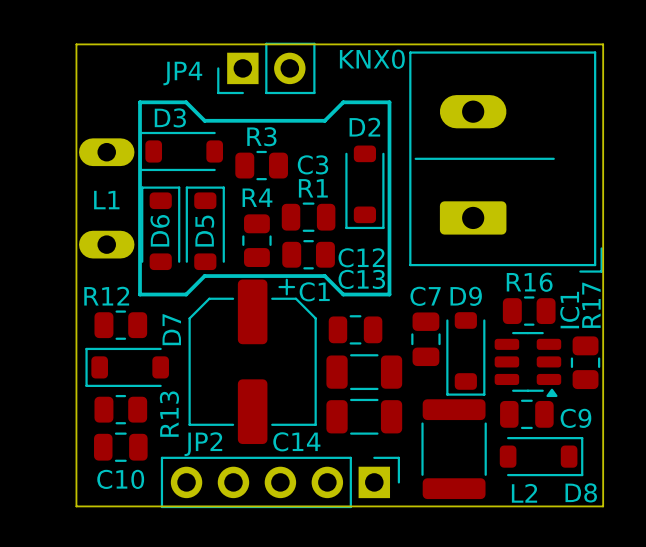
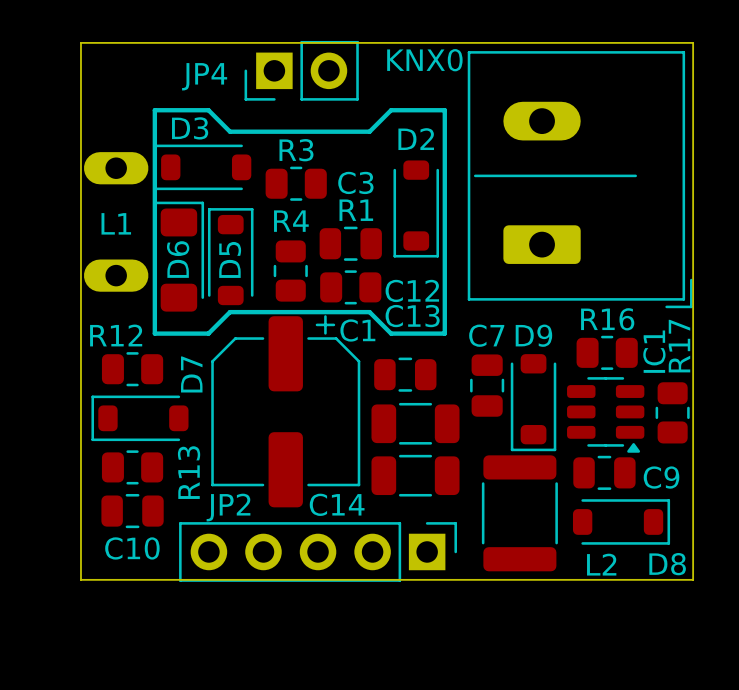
D6 footprint: [141, 186, 181, 271] -> [153, 201, 205, 312]

